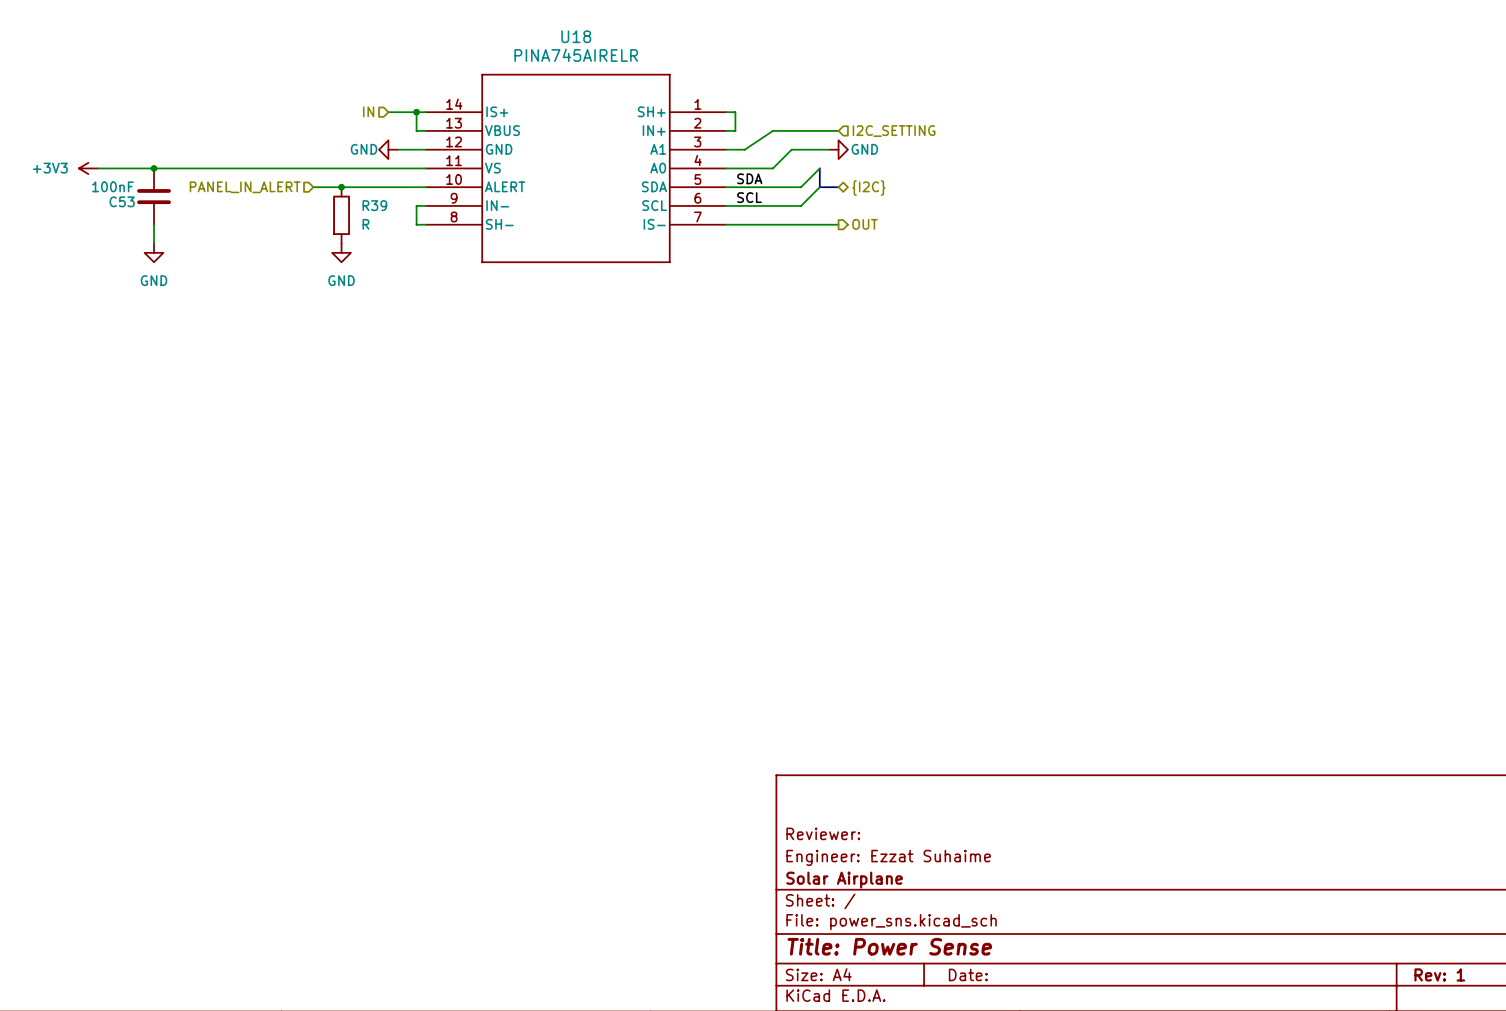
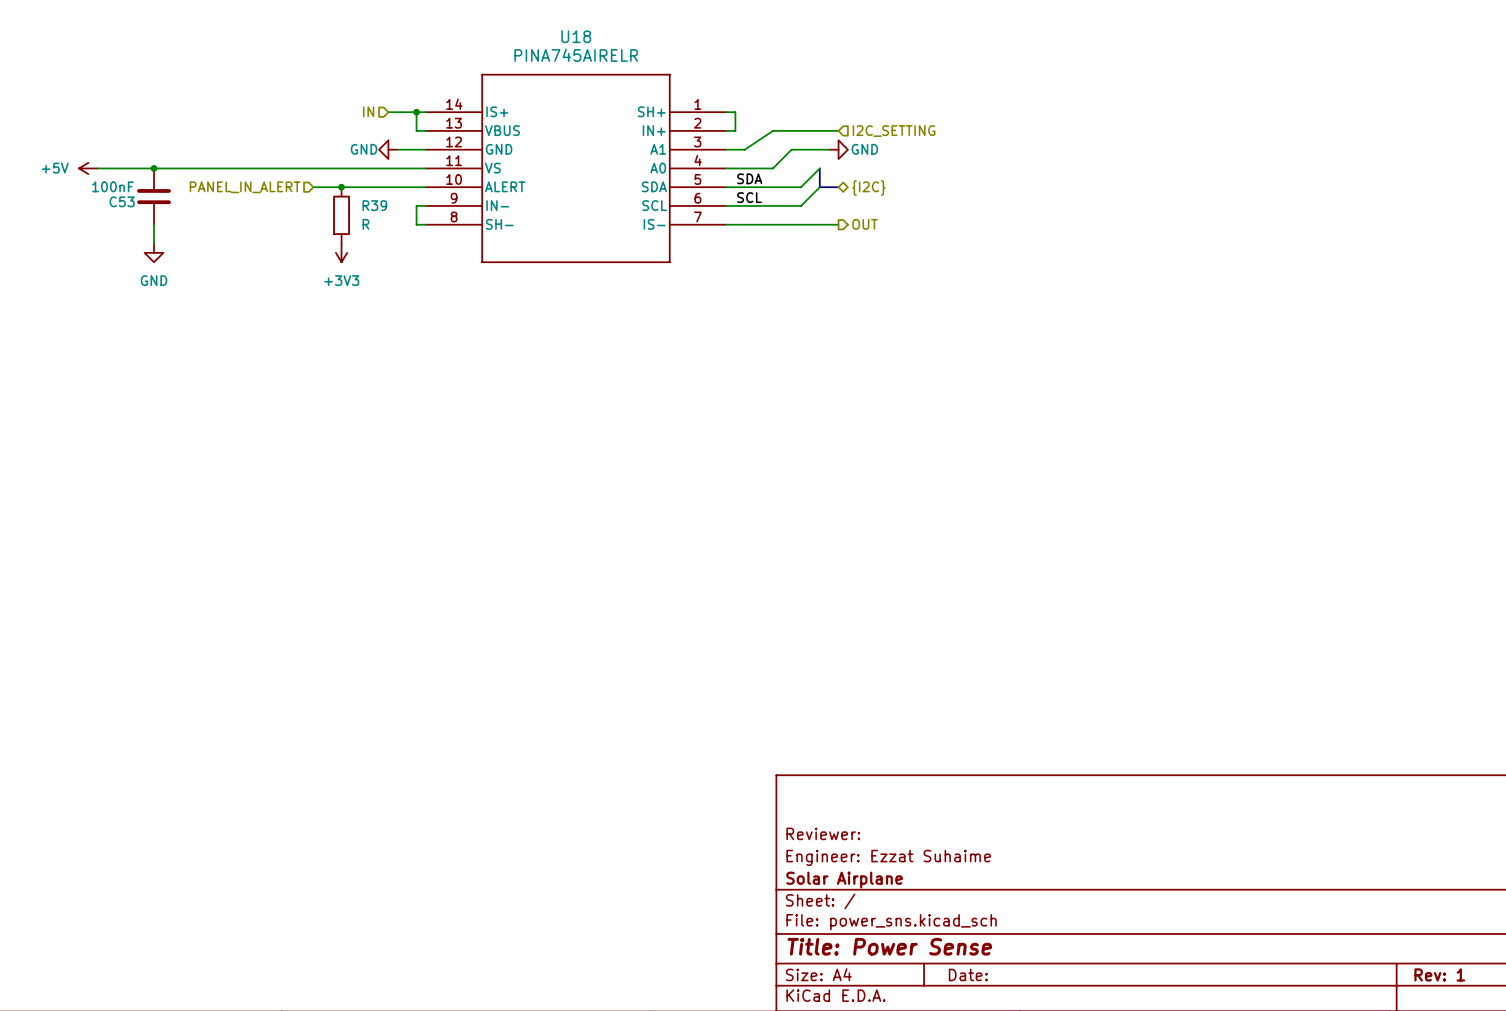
power symbol: +3V3 (88, 168) -> +5V (88, 168)
power symbol: GND (341, 252) -> +3V3 (341, 252)

